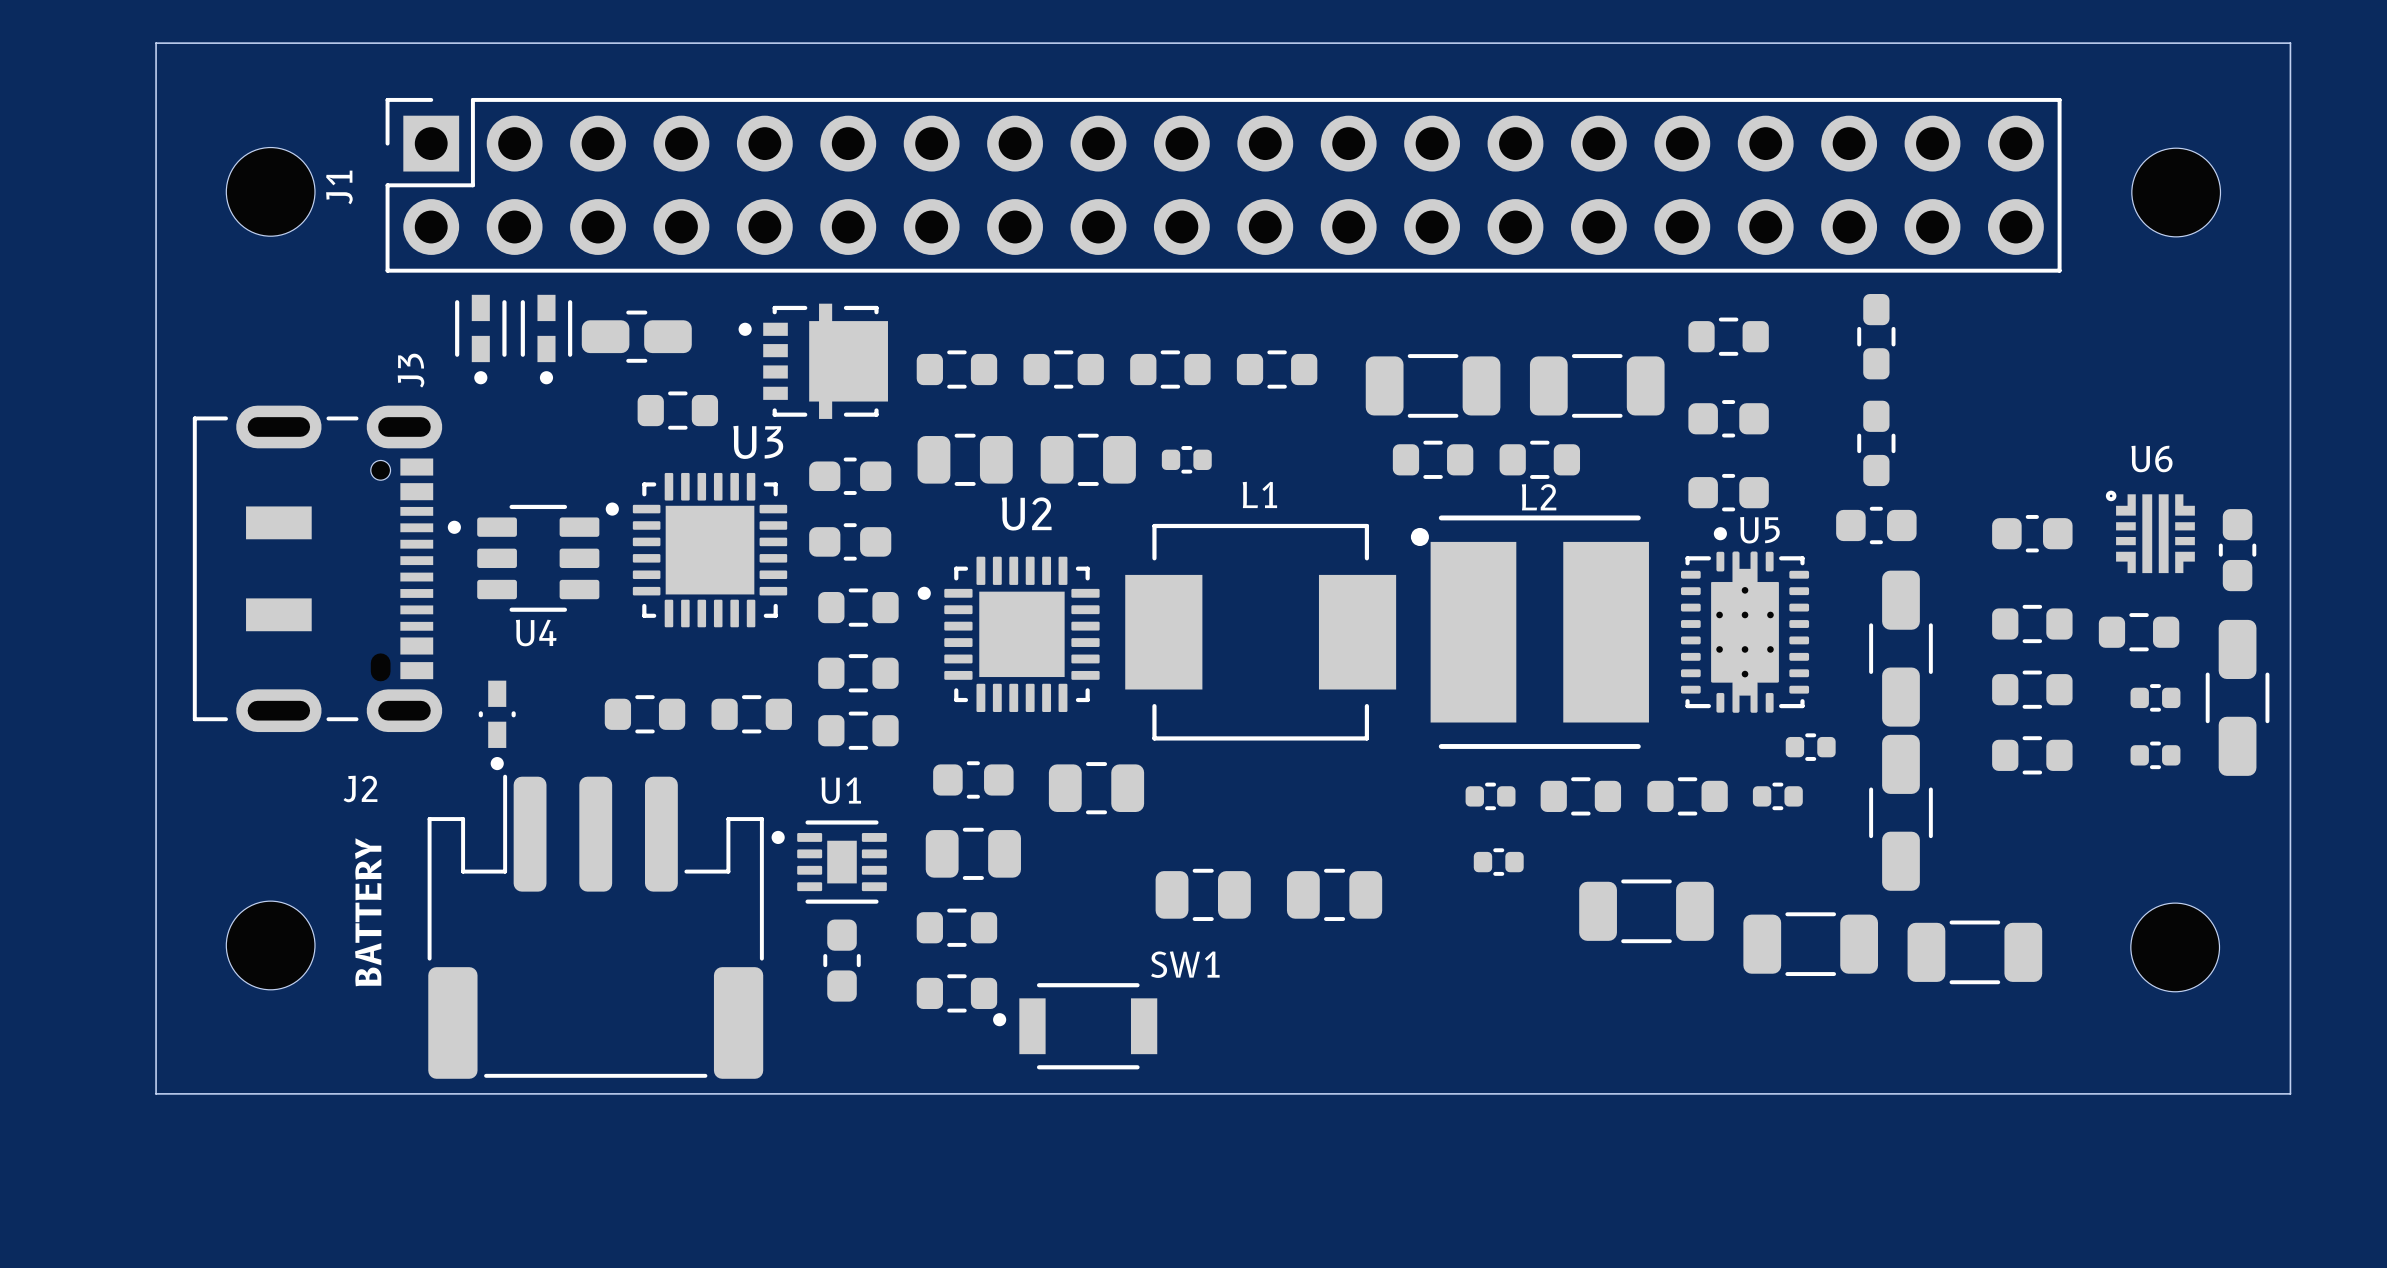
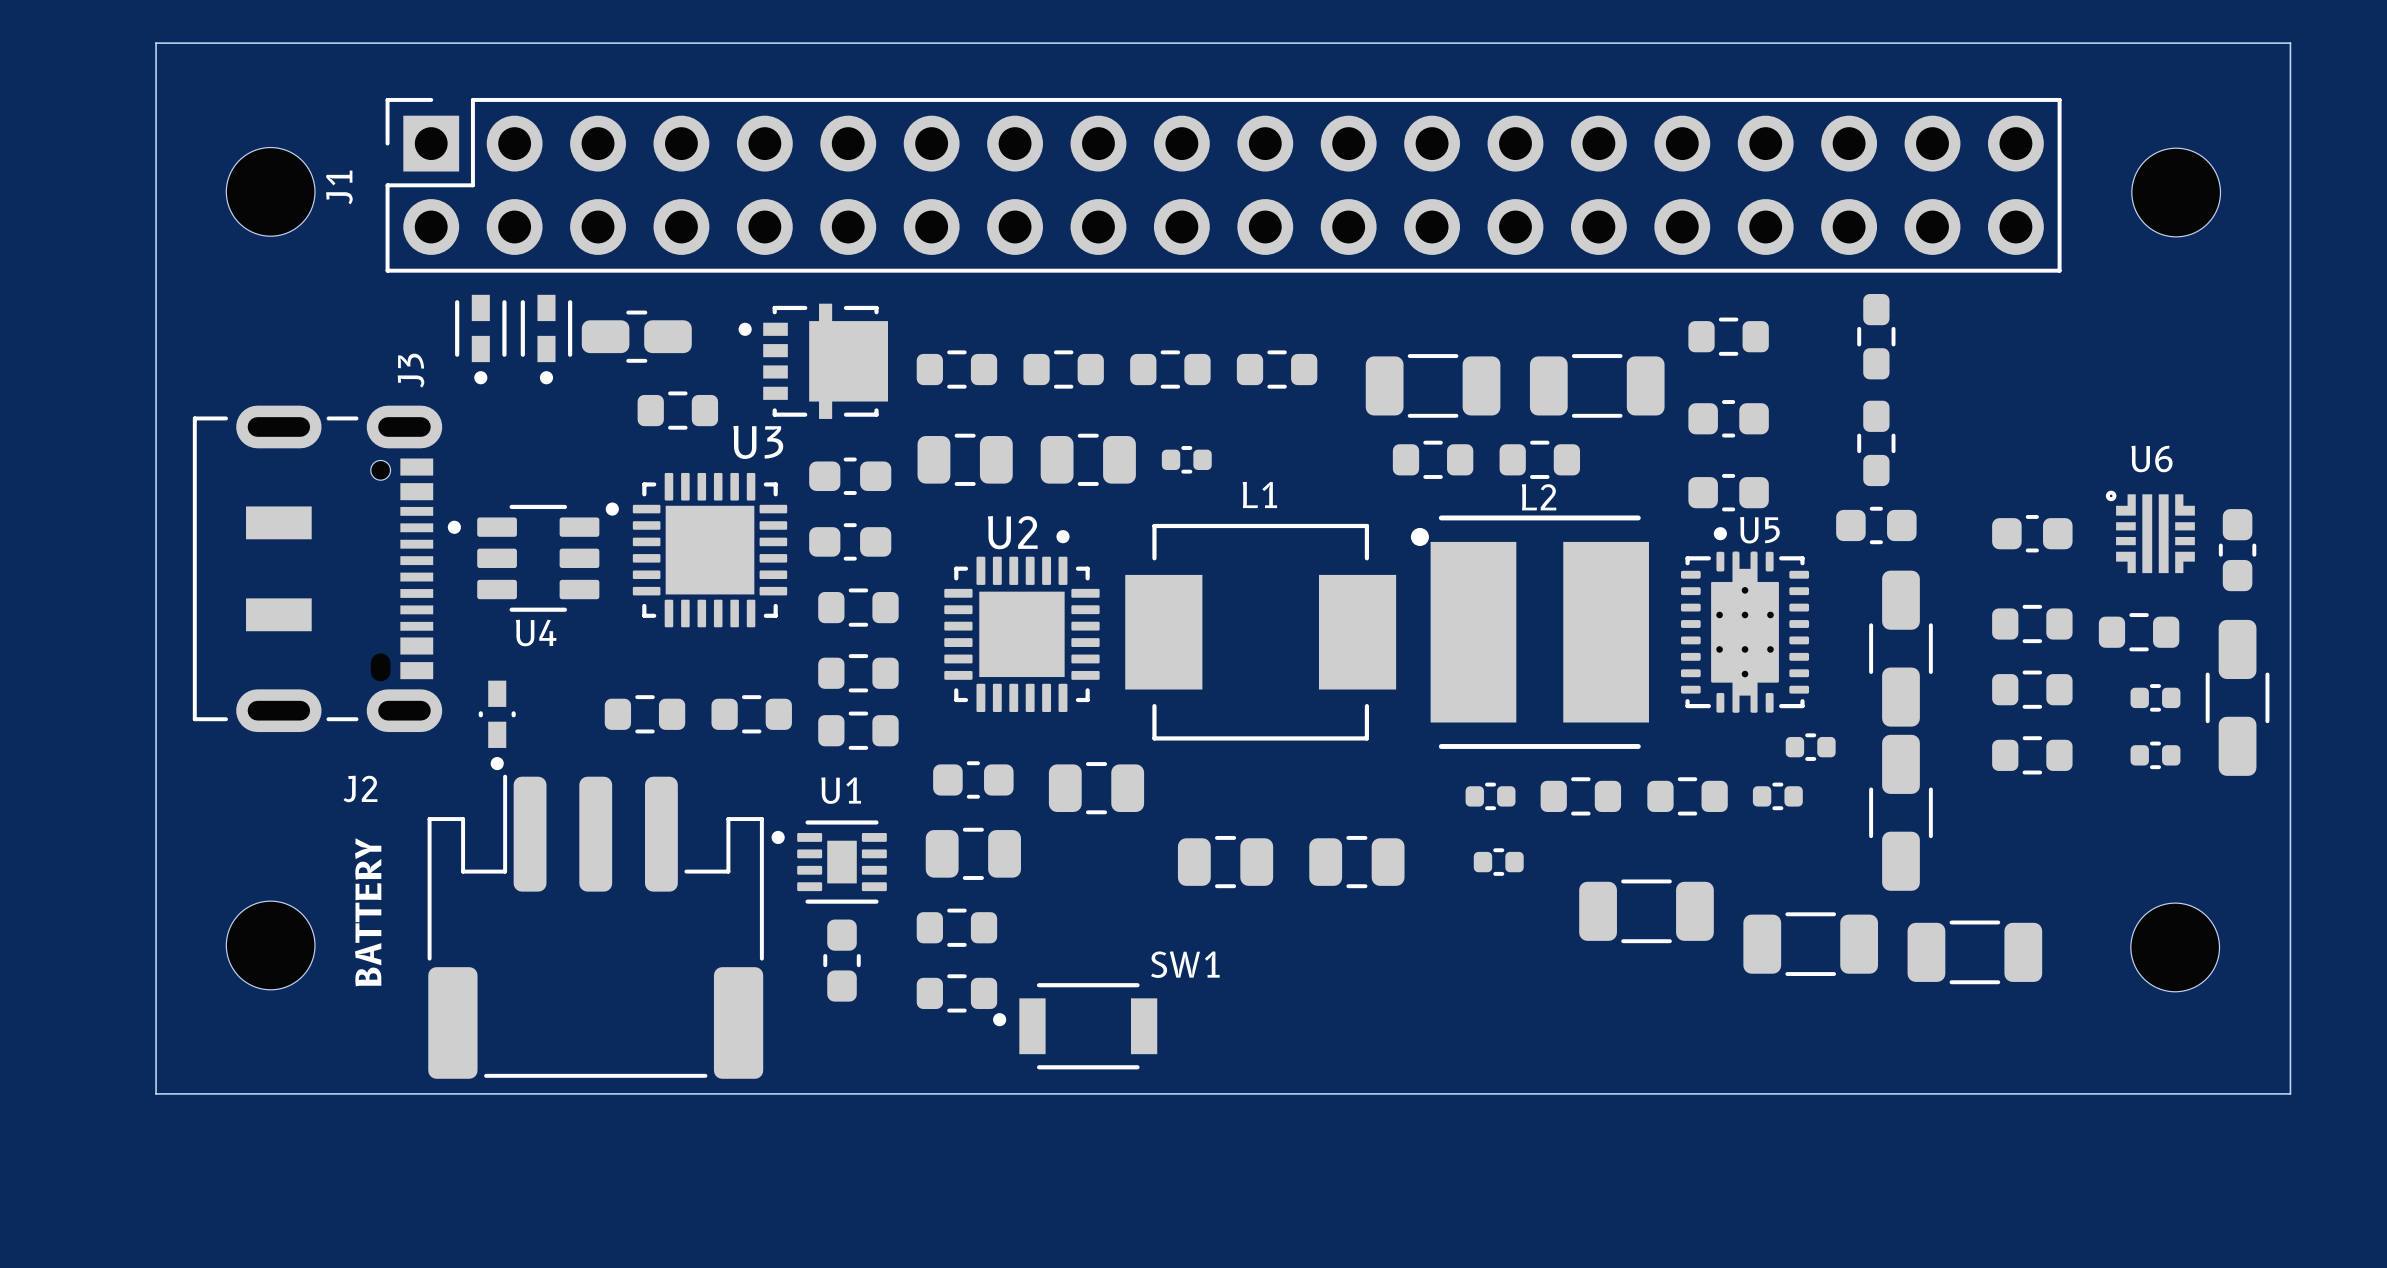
U2 rotation: 0° (1008, 634) -> 90° clockwise (1021, 621)
part position: (1203, 894) -> (1225, 862)
part position: (1334, 894) -> (1356, 862)

